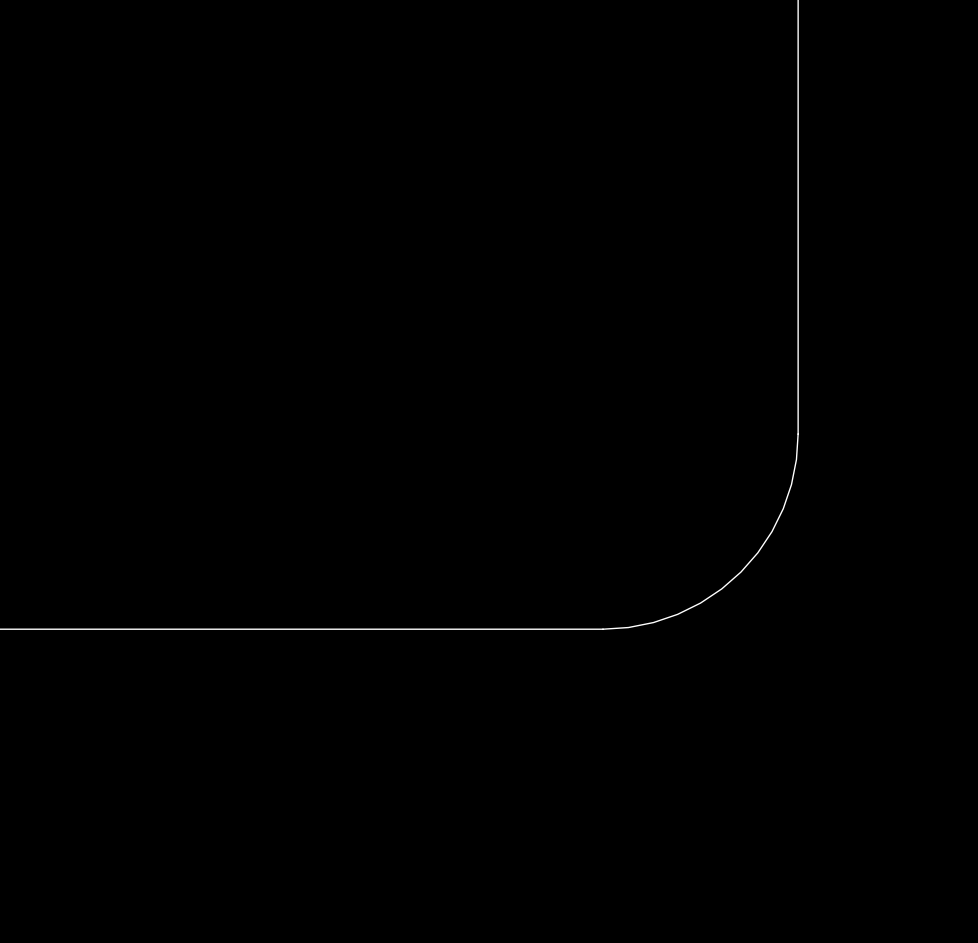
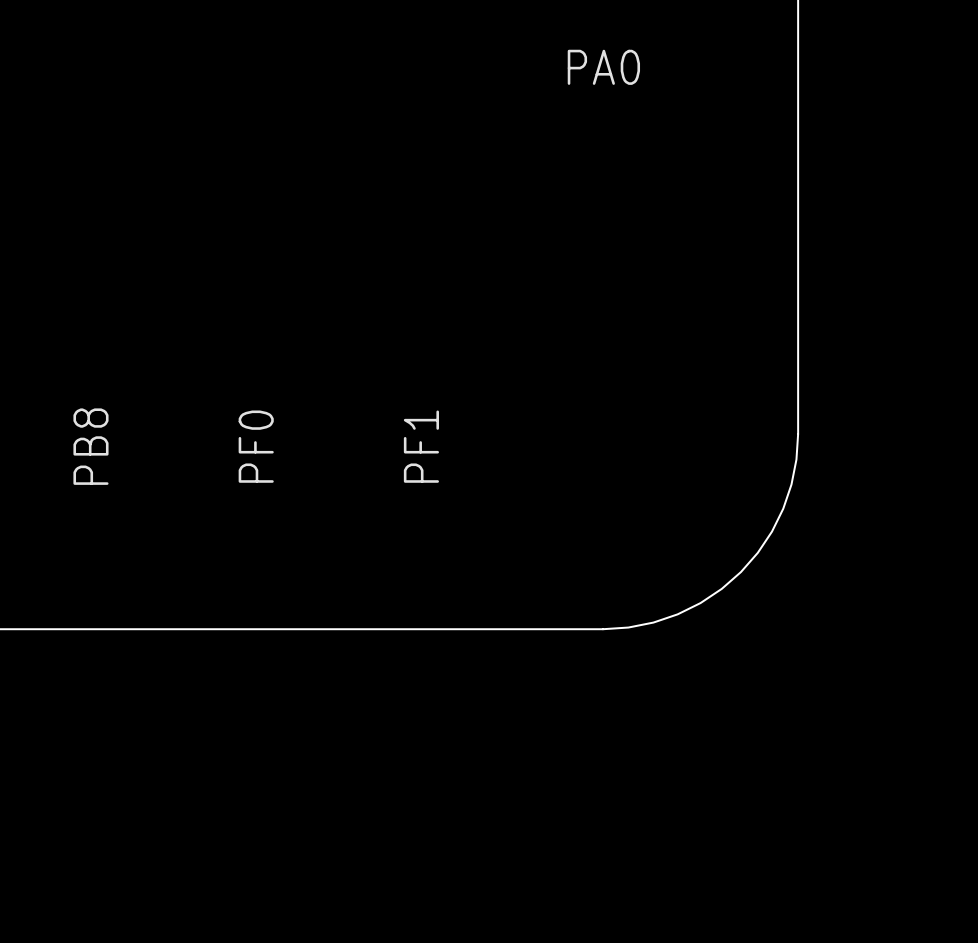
text: none -> PA0 (603, 67)
text: none -> PB8 (90, 446)
text: none -> PF0 (256, 446)
text: none -> PF1 (421, 446)

